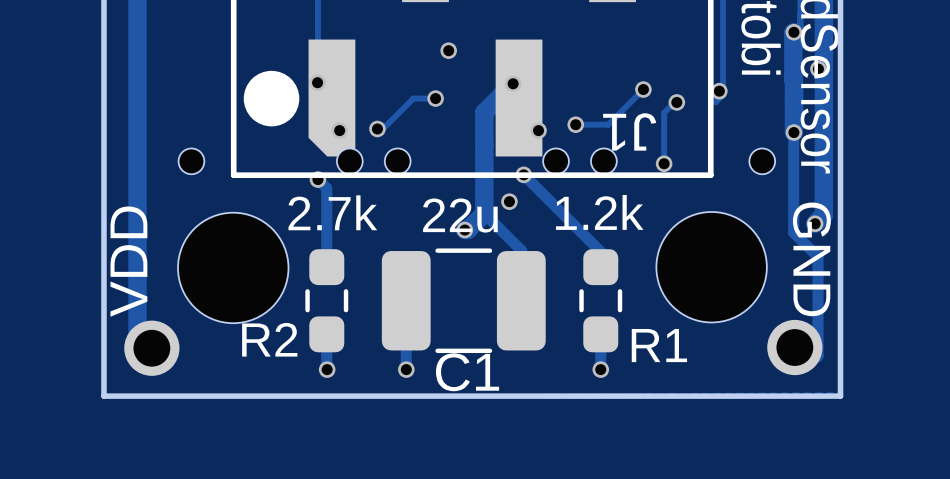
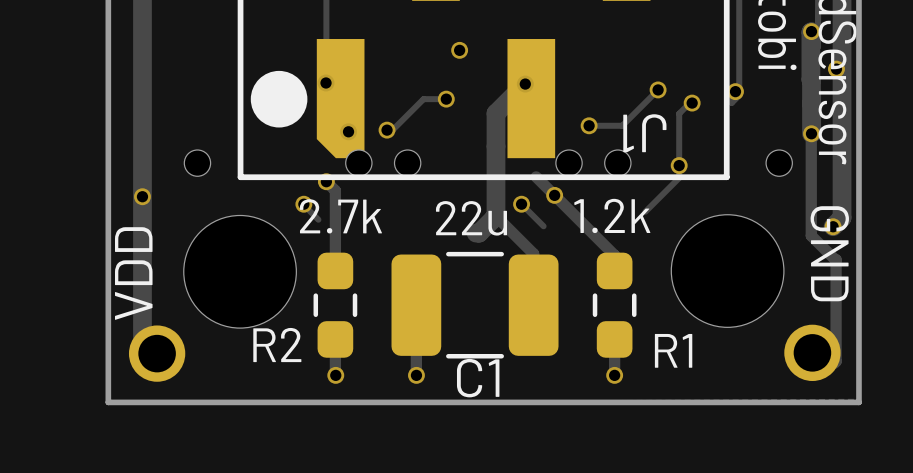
via: (538, 130) -> none
track: none -> (679, 165) (679, 177) (645, 211)
via position: (523, 174) -> (554, 195)
via: none -> (142, 196)
track: none -> (303, 204) (318, 219)
via: none -> (303, 204)
track: none -> (521, 204) (543, 226)
via: (464, 230) -> none

